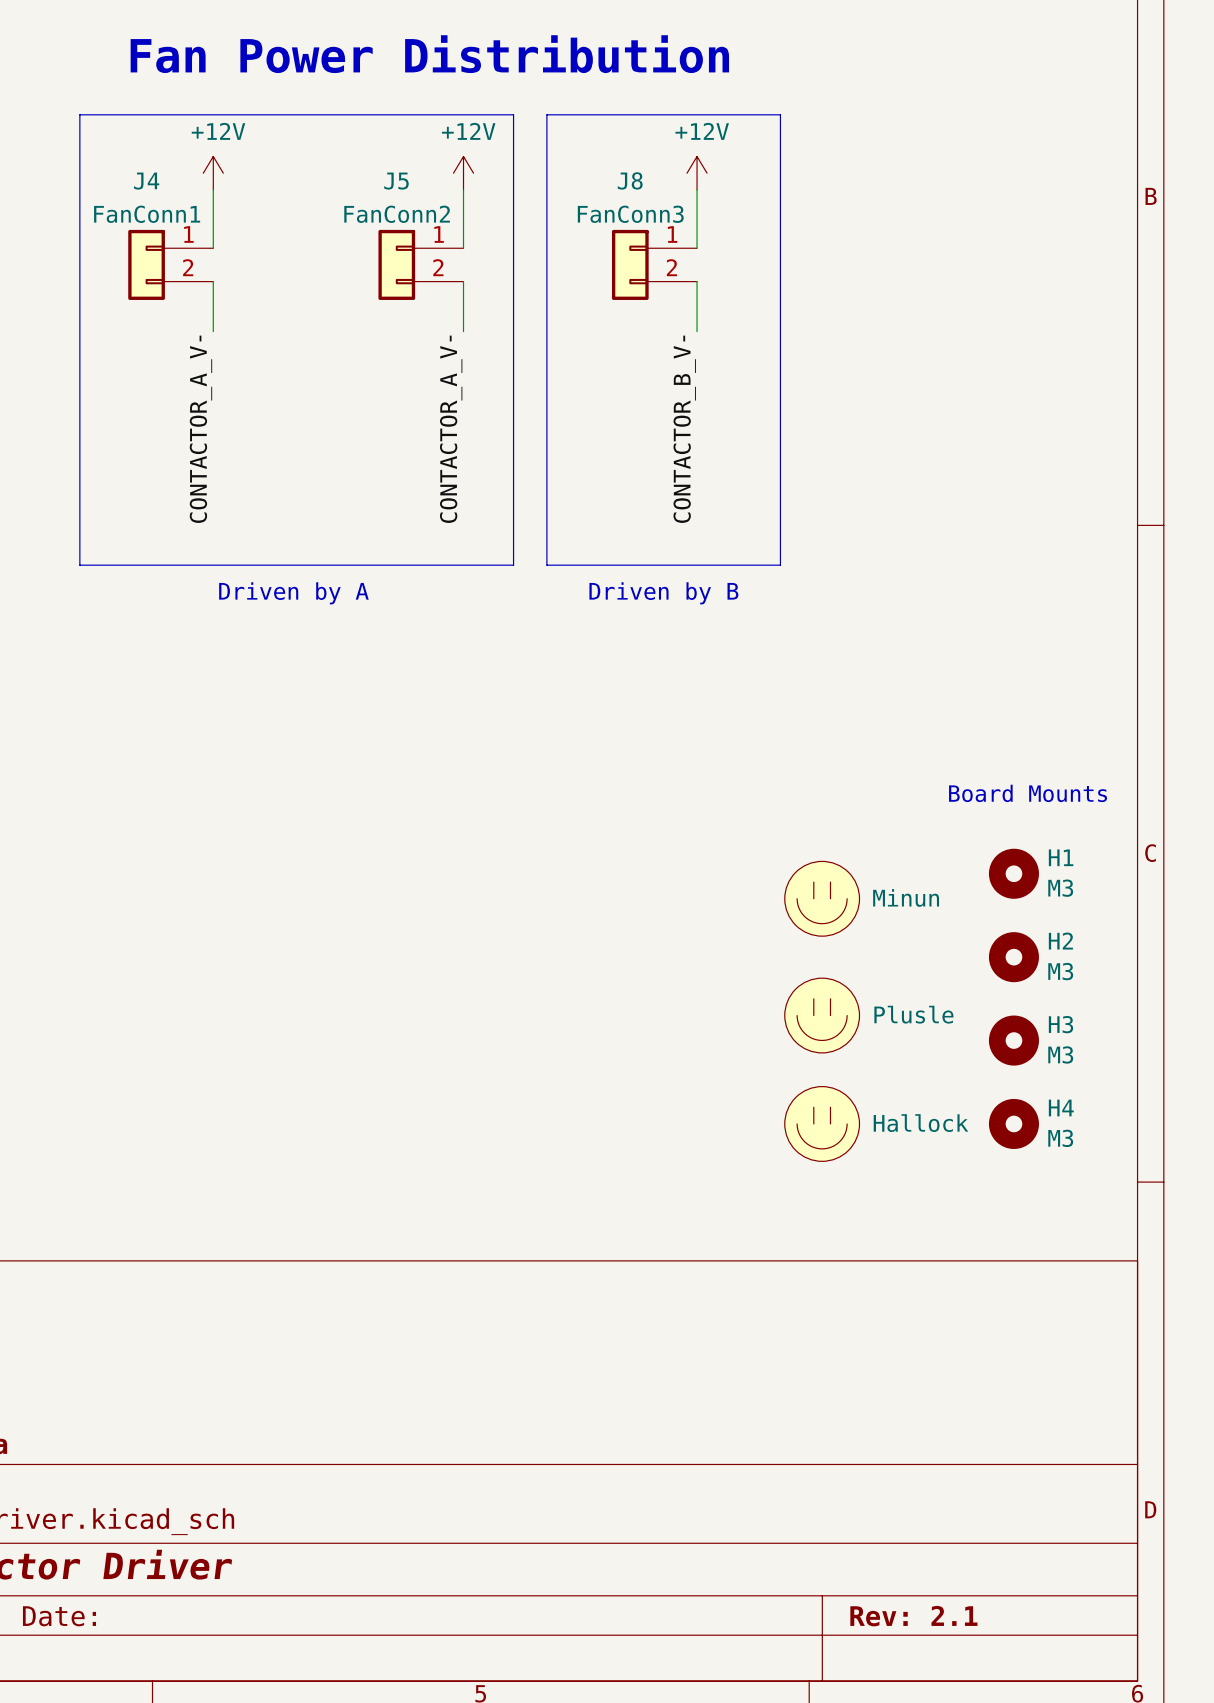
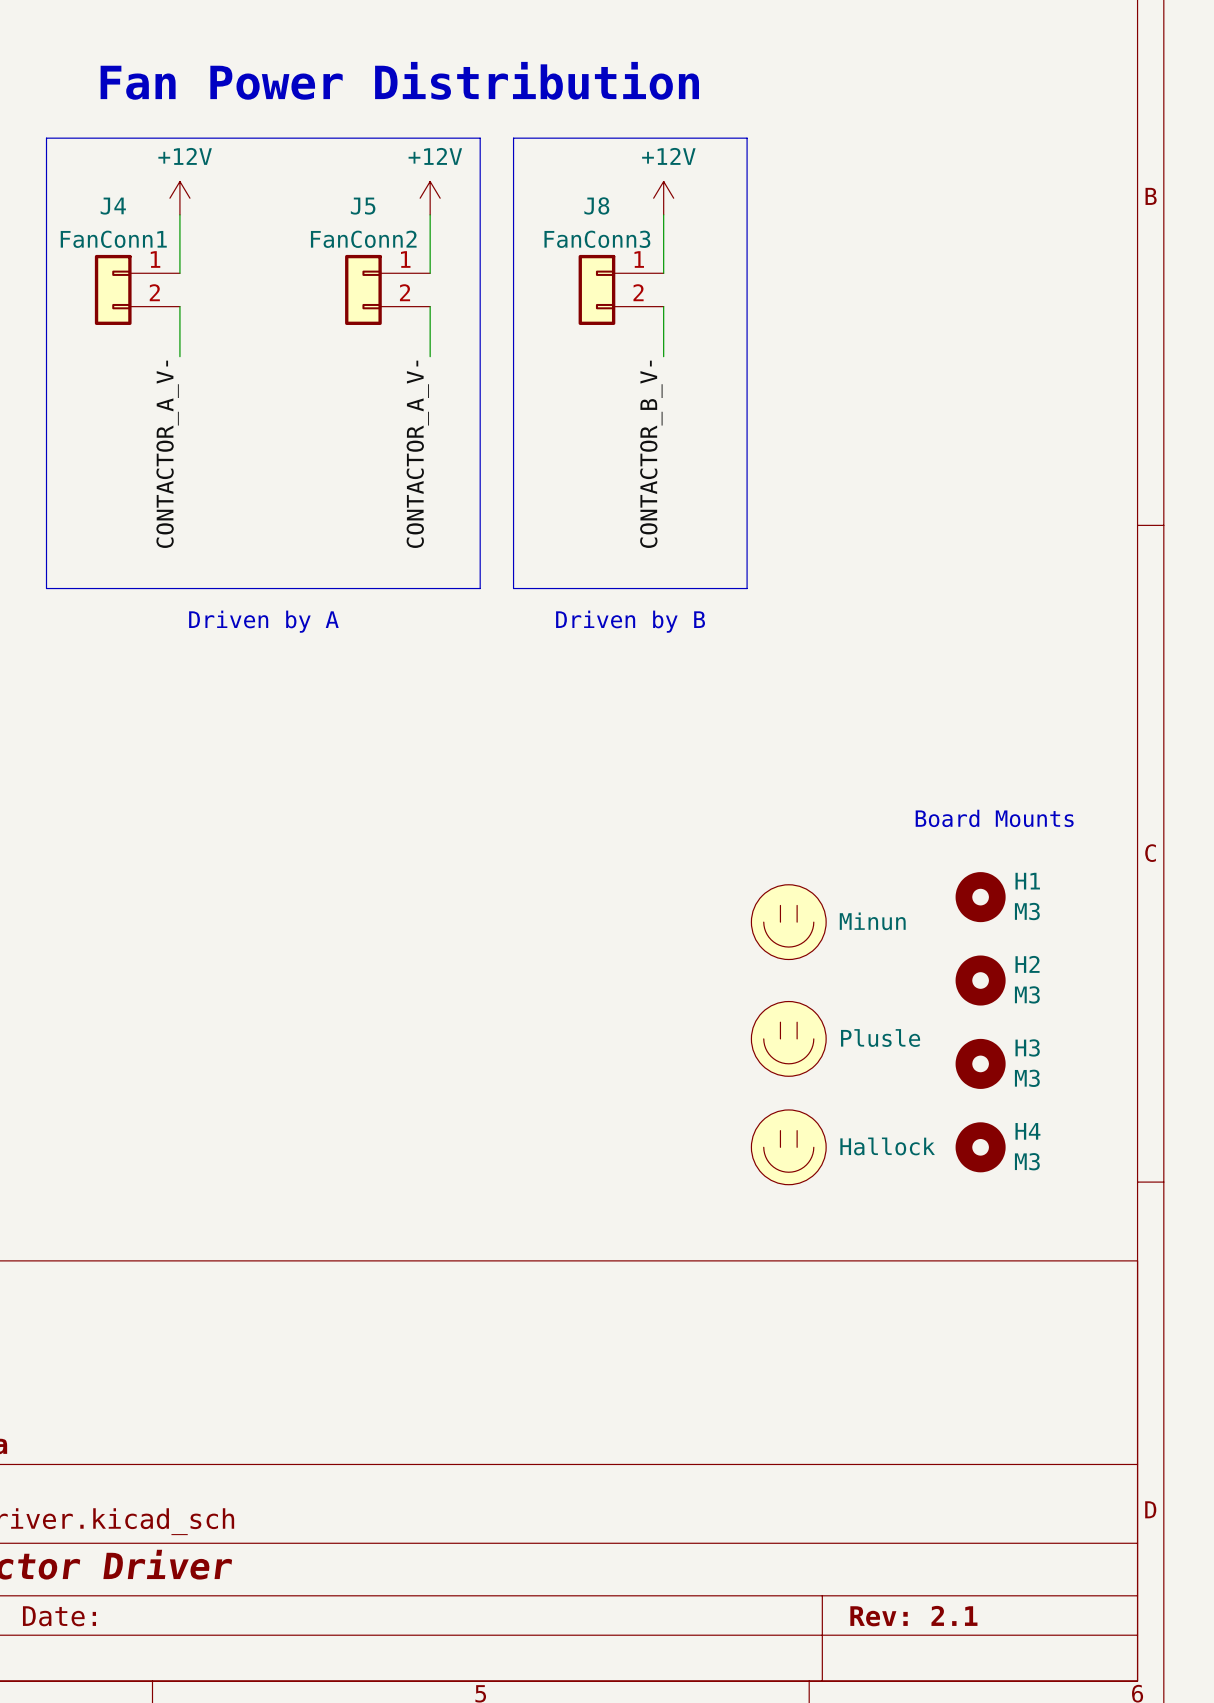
text position: Fan Power Distribution (429, 54) -> Fan Power Distribution (399, 80)
line: (546, 114) (780, 114) (780, 565) (546, 565) (546, 114) -> none
line: none -> (46, 138) (480, 138) (480, 588) (46, 588) (46, 138)
line: (513, 138) (513, 114) (79, 114) (79, 565) (513, 565) -> (513, 138) (747, 138) (747, 588) (513, 588) (513, 565)
power symbol position: +12V (213, 173) -> +12V (179, 198)
power symbol position: +12V (463, 173) -> +12V (430, 198)
power symbol position: +12V (697, 173) -> +12V (663, 198)
wire: (213, 189) (213, 248) -> (179, 214) (179, 273)
wire: (463, 189) (463, 248) -> (430, 214) (430, 273)
wire: (697, 189) (697, 248) -> (663, 214) (663, 273)
J4 position: (170, 264) -> (137, 289)
J5 position: (420, 264) -> (387, 289)
J8 position: (654, 264) -> (621, 289)
wire: (213, 281) (213, 331) -> (179, 306) (179, 356)
wire: (463, 281) (463, 331) -> (430, 306) (430, 356)
wire: (697, 281) (697, 331) -> (663, 306) (663, 356)
label position: CONTACTOR_A_V- (200, 429) -> CONTACTOR_A_V- (167, 454)
label position: CONTACTOR_A_V- (451, 429) -> CONTACTOR_A_V- (417, 454)
label position: CONTACTOR_B_V- (684, 429) -> CONTACTOR_B_V- (651, 454)
text position: Driven by A (293, 593) -> Driven by A (263, 621)
text position: Driven by B (663, 593) -> Driven by B (630, 621)
text position: Board Mounts (1028, 793) -> Board Mounts (994, 818)
H1 position: (1013, 873) -> (980, 897)
part position: (822, 898) -> (788, 922)
H2 position: (1013, 957) -> (980, 980)
part position: (822, 1015) -> (788, 1038)
H3 position: (1013, 1040) -> (980, 1063)
part position: (822, 1123) -> (788, 1147)
H4 position: (1013, 1123) -> (980, 1147)

